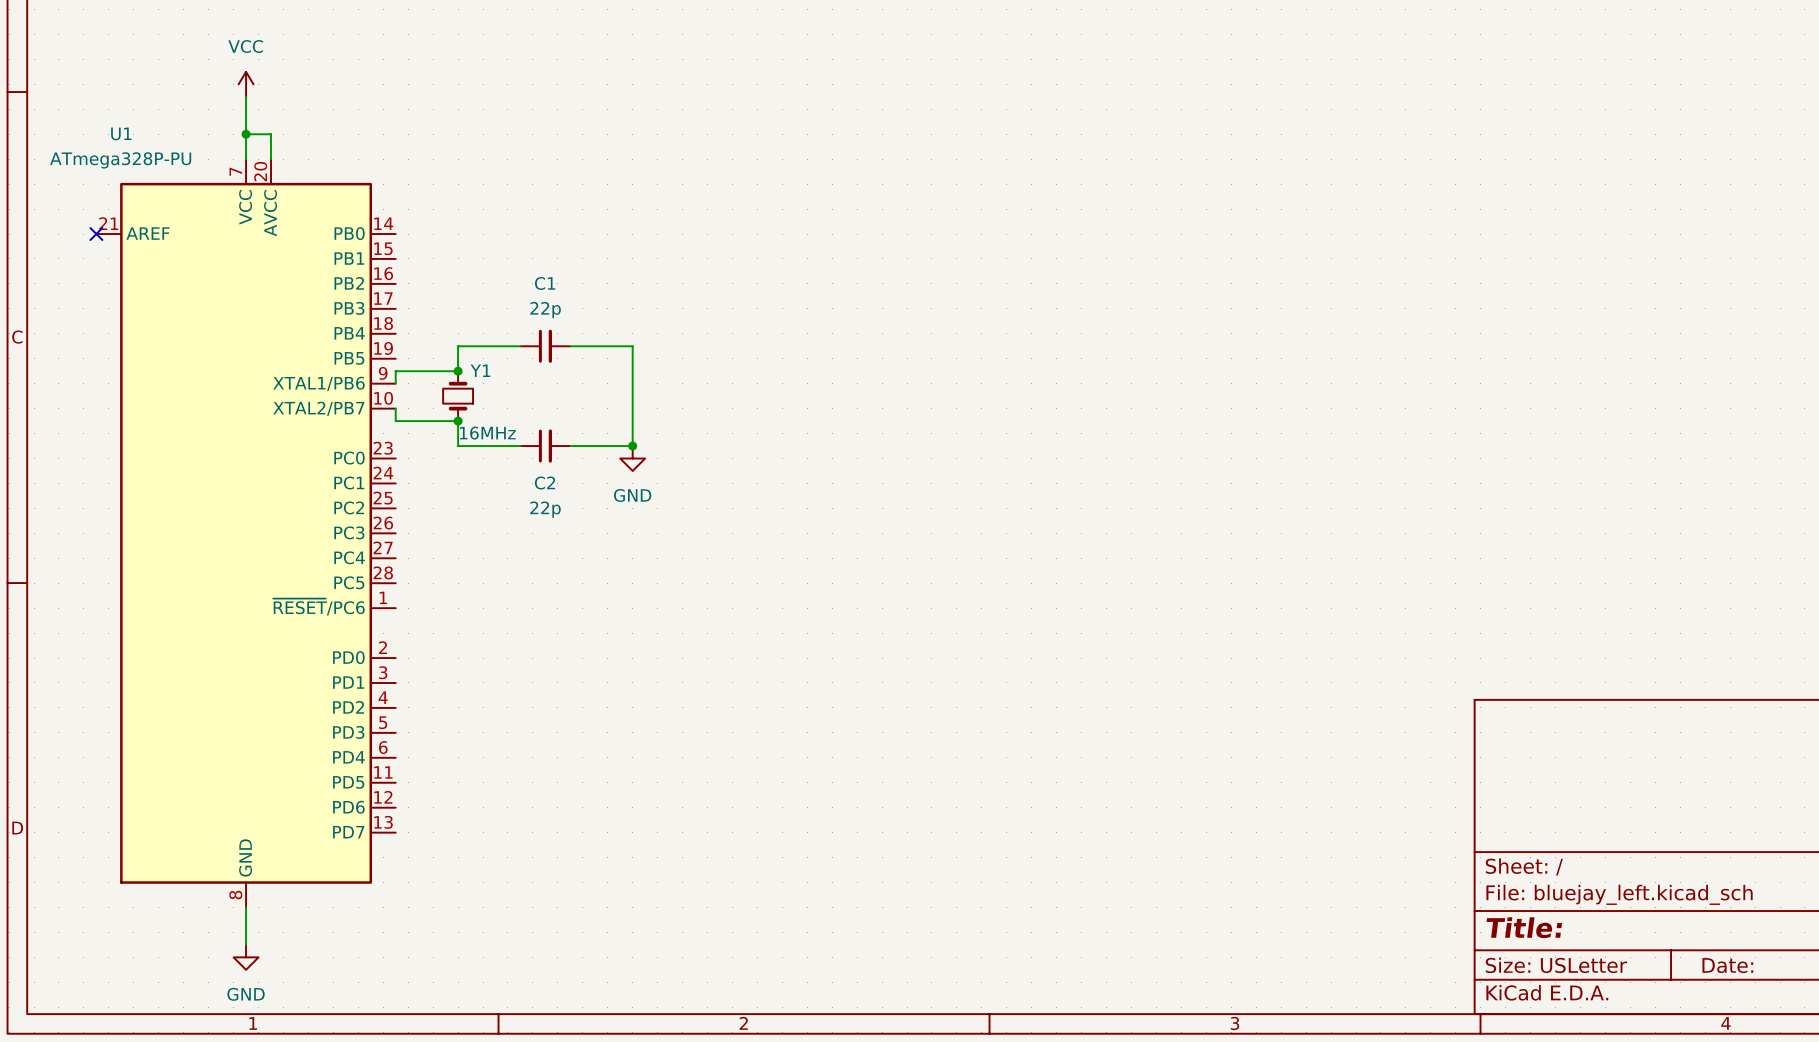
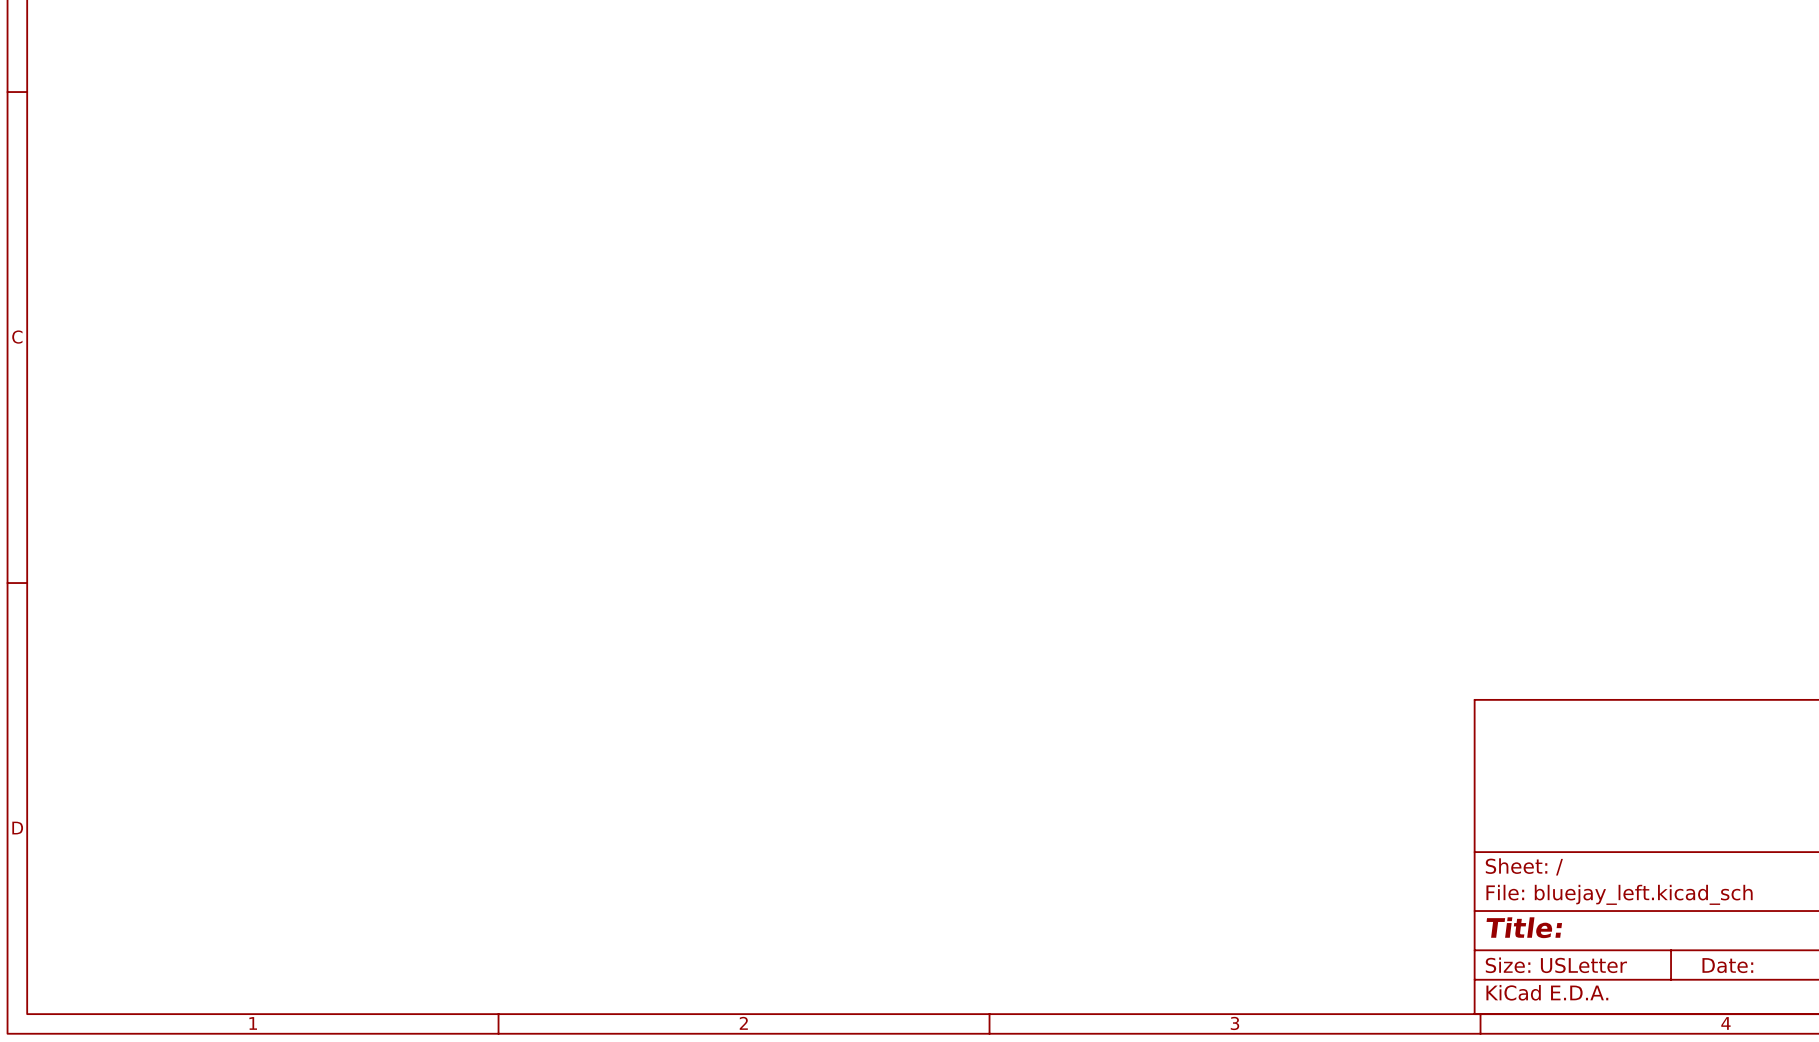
power symbol: VCC (246, 84) -> none
wire: (246, 96) (246, 159) -> none
wire: (246, 134) (271, 134) (271, 159) -> none
junction: (246, 134) -> none
no-connect mark: (96, 234) -> none
wire: (520, 346) (458, 346) (458, 371) (395, 371) (395, 383) -> none
C1: 22p (545, 346) -> none
wire: (570, 346) (632, 346) (632, 446) (570, 446) -> none
junction: (458, 371) -> none
Y1: 16MHz (458, 396) -> none
wire: (395, 408) (395, 421) (458, 421) (458, 446) (520, 446) -> none
junction: (458, 421) -> none
C2: 22p (545, 446) -> none
junction: (632, 446) -> none
power symbol: GND (632, 458) -> none
U1: ATmega328P-PU (246, 533) -> none
wire: (246, 907) (246, 944) -> none
power symbol: GND (246, 957) -> none

